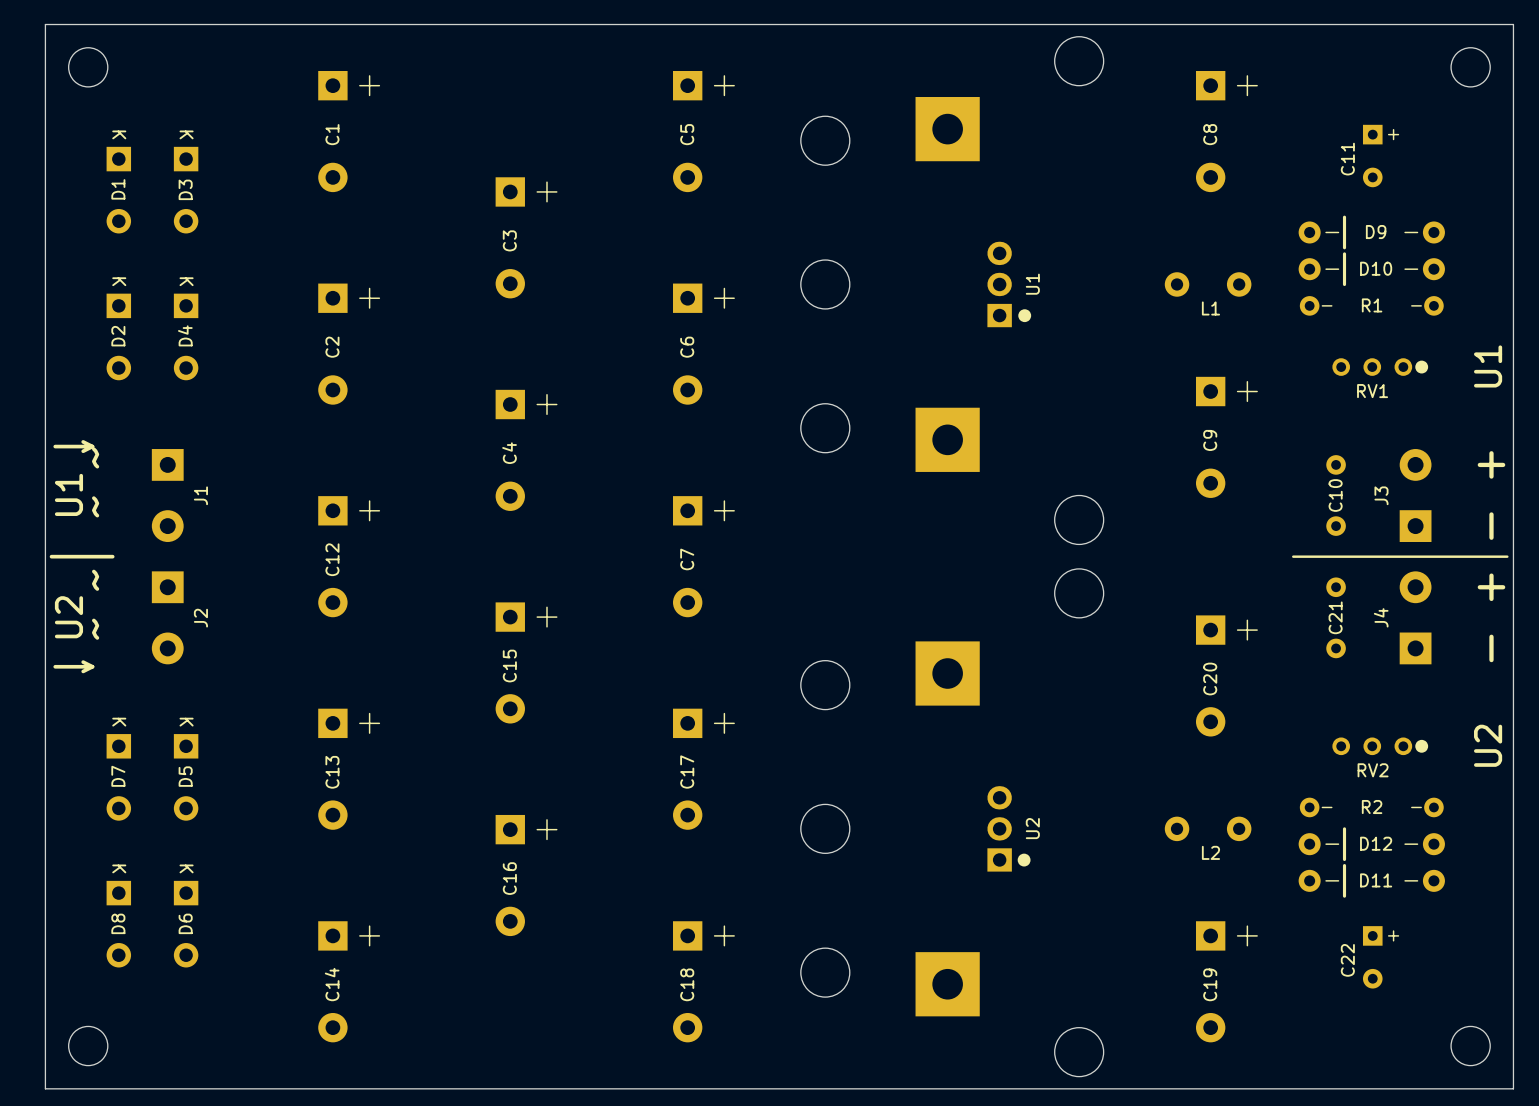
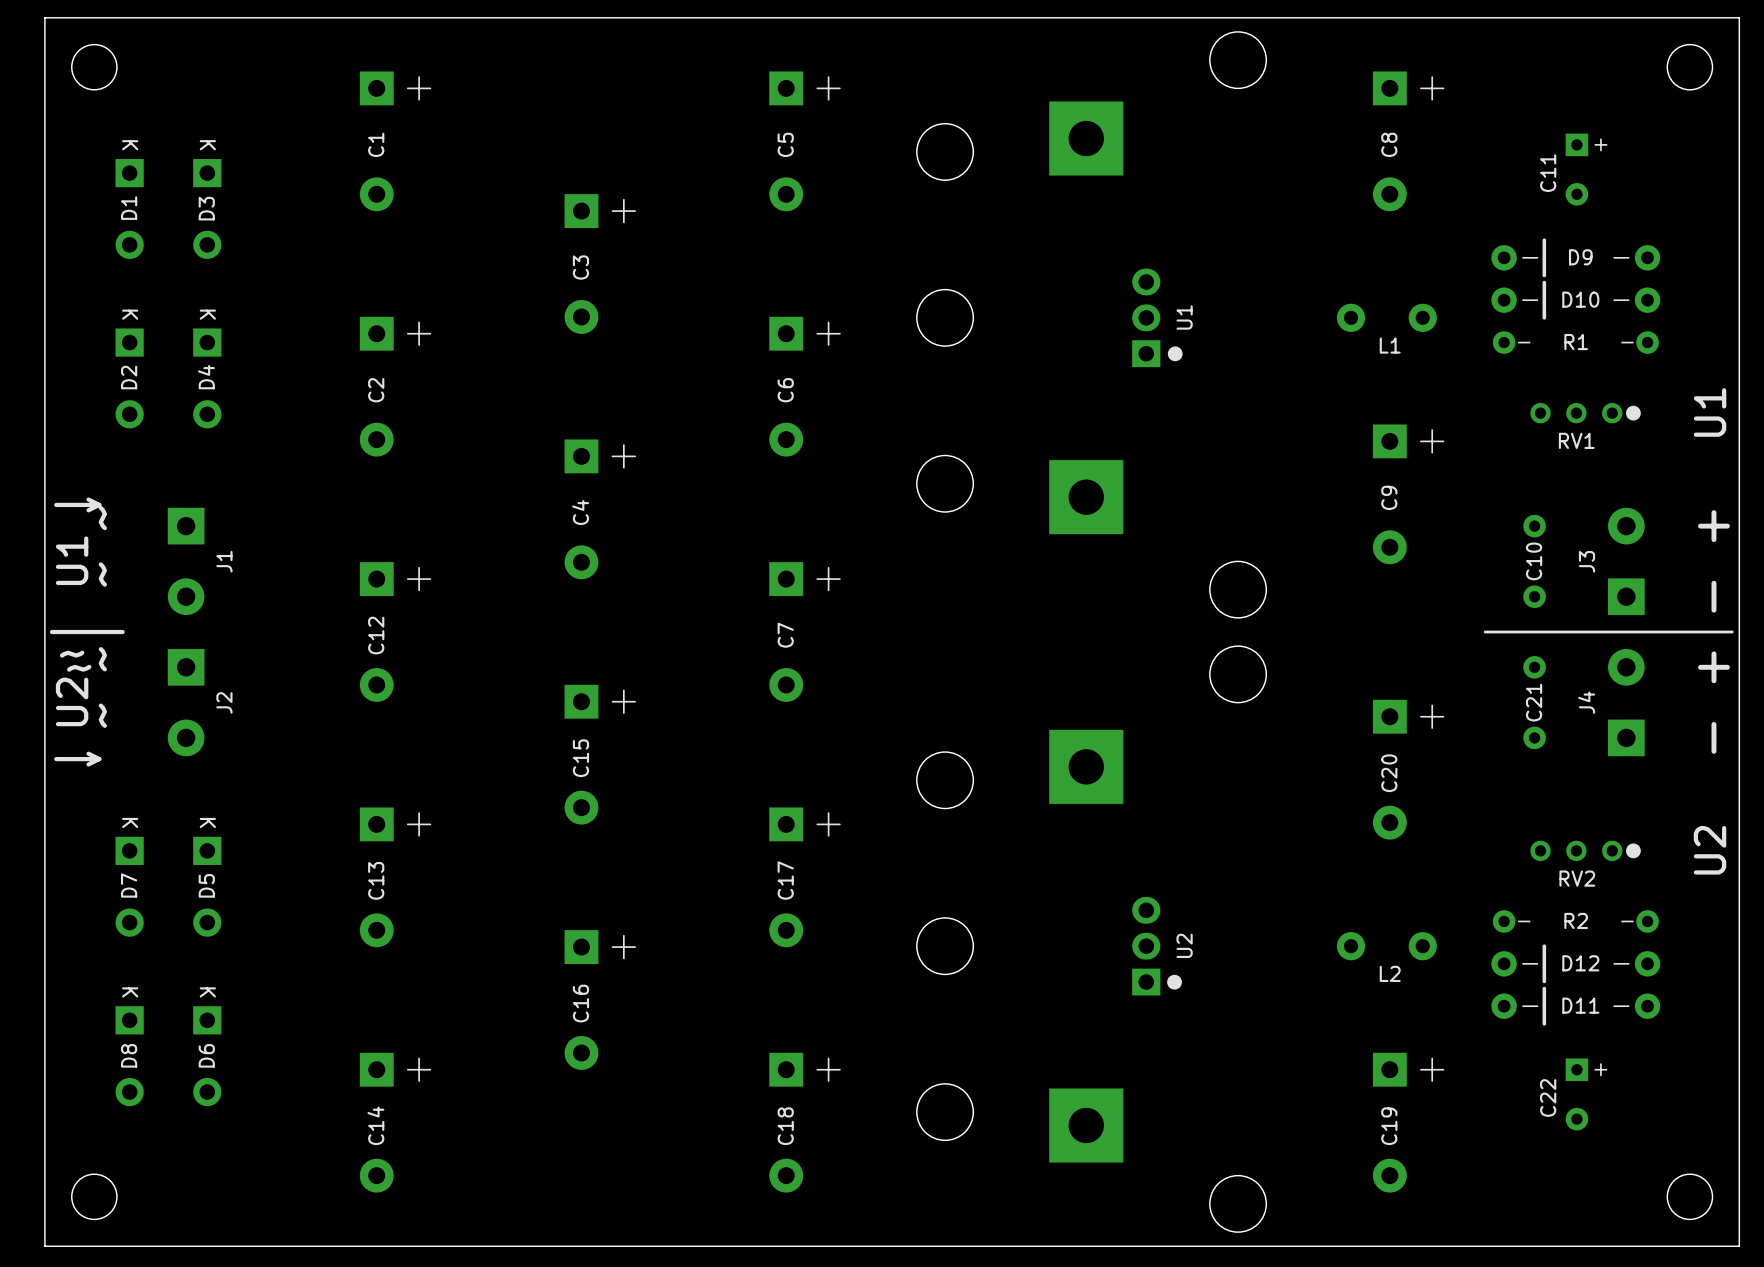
text: none -> ~ (72, 654)
text: none -> ~ (79, 668)

